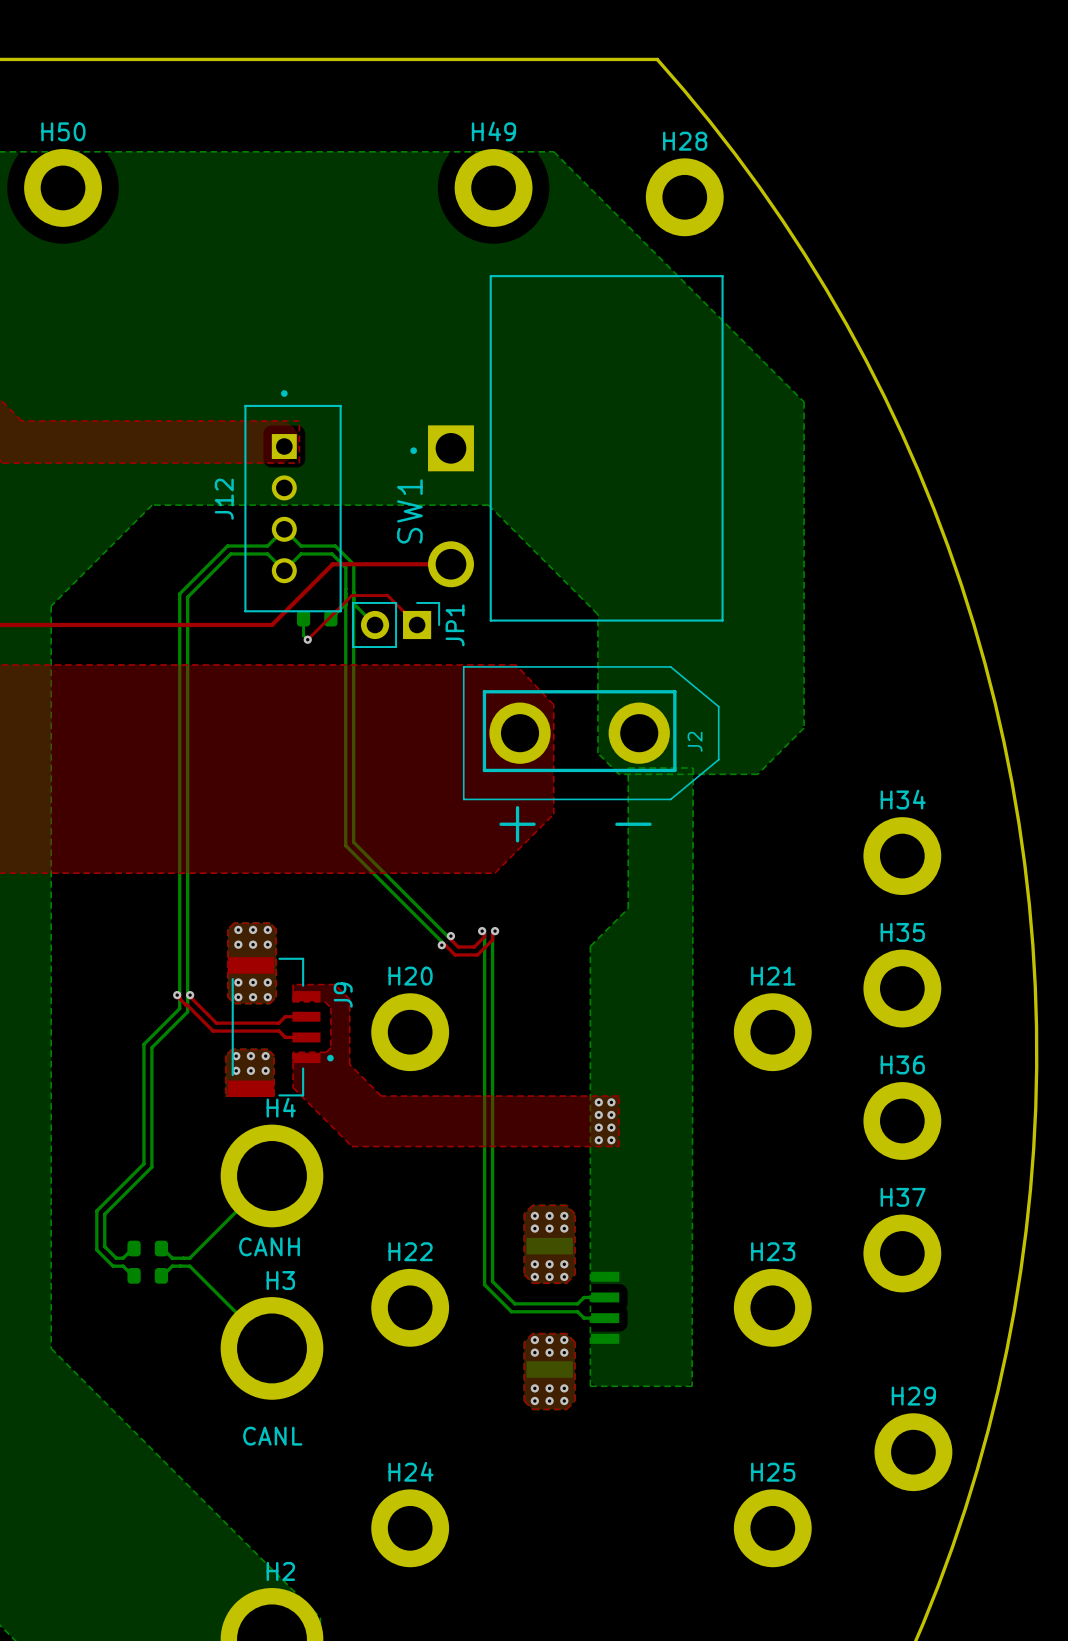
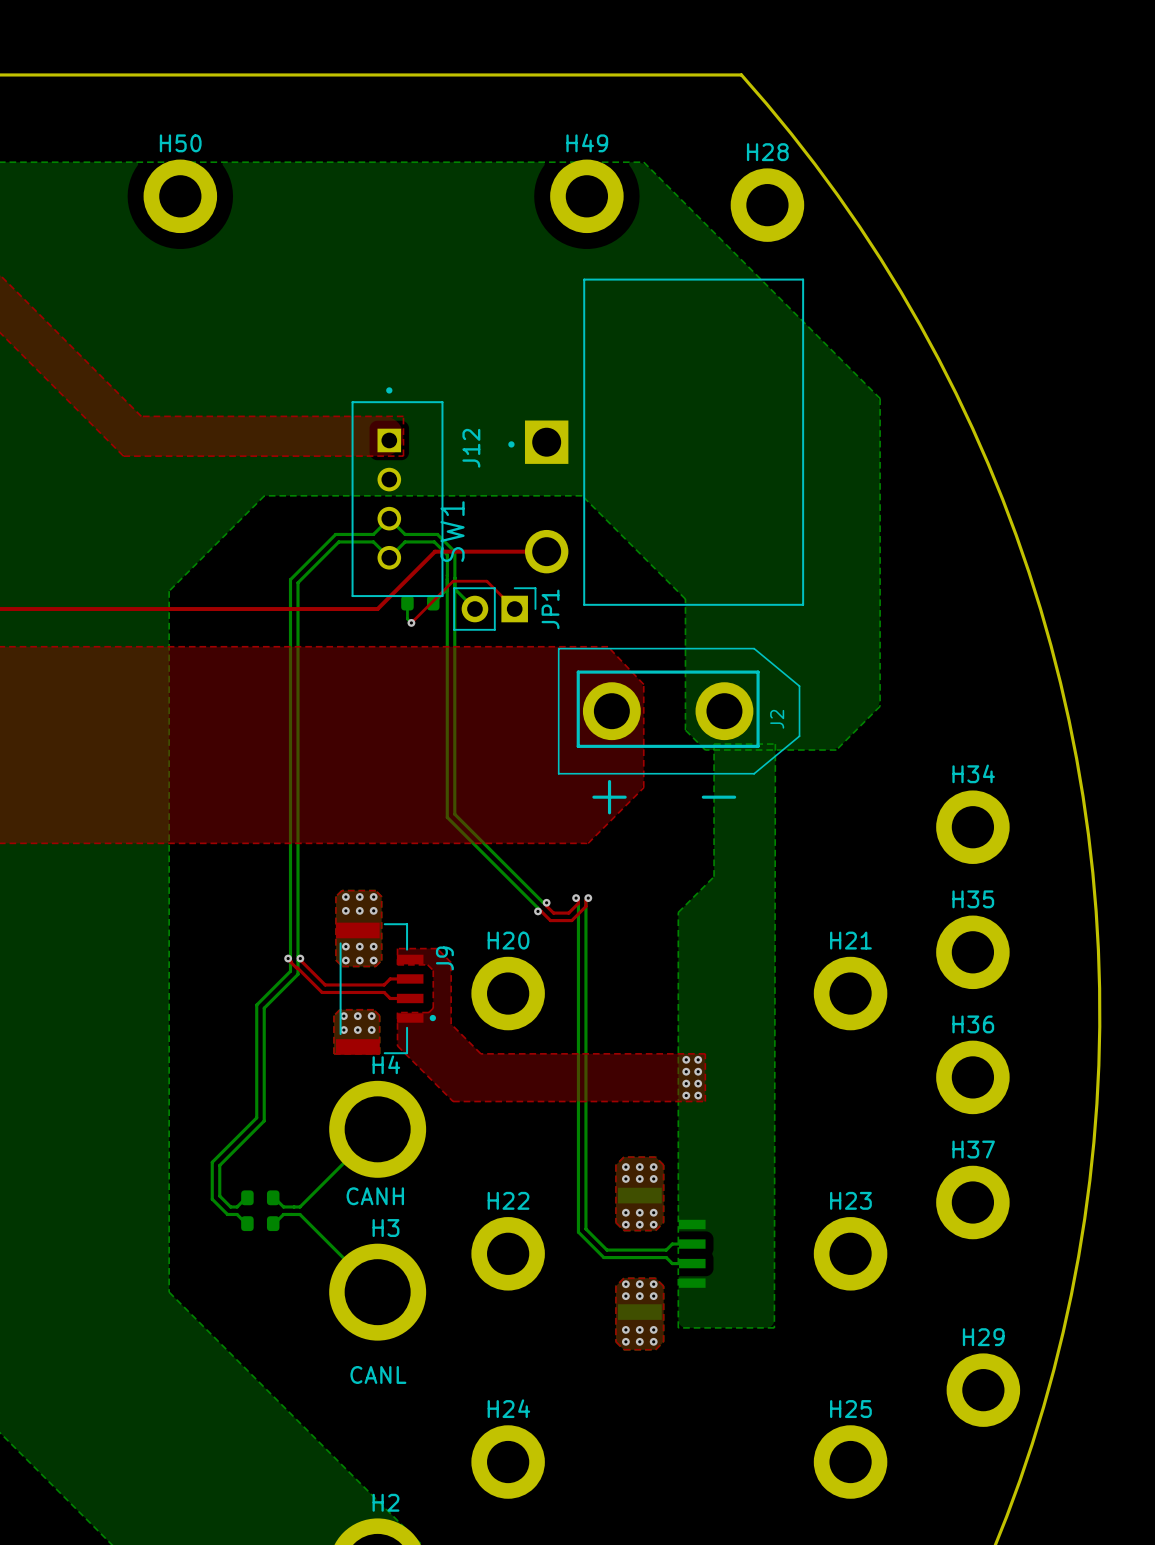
J12 name position: J12 (224, 499) -> J12 (471, 448)
SW1 name position: SW1 (409, 511) -> SW1 (452, 531)

